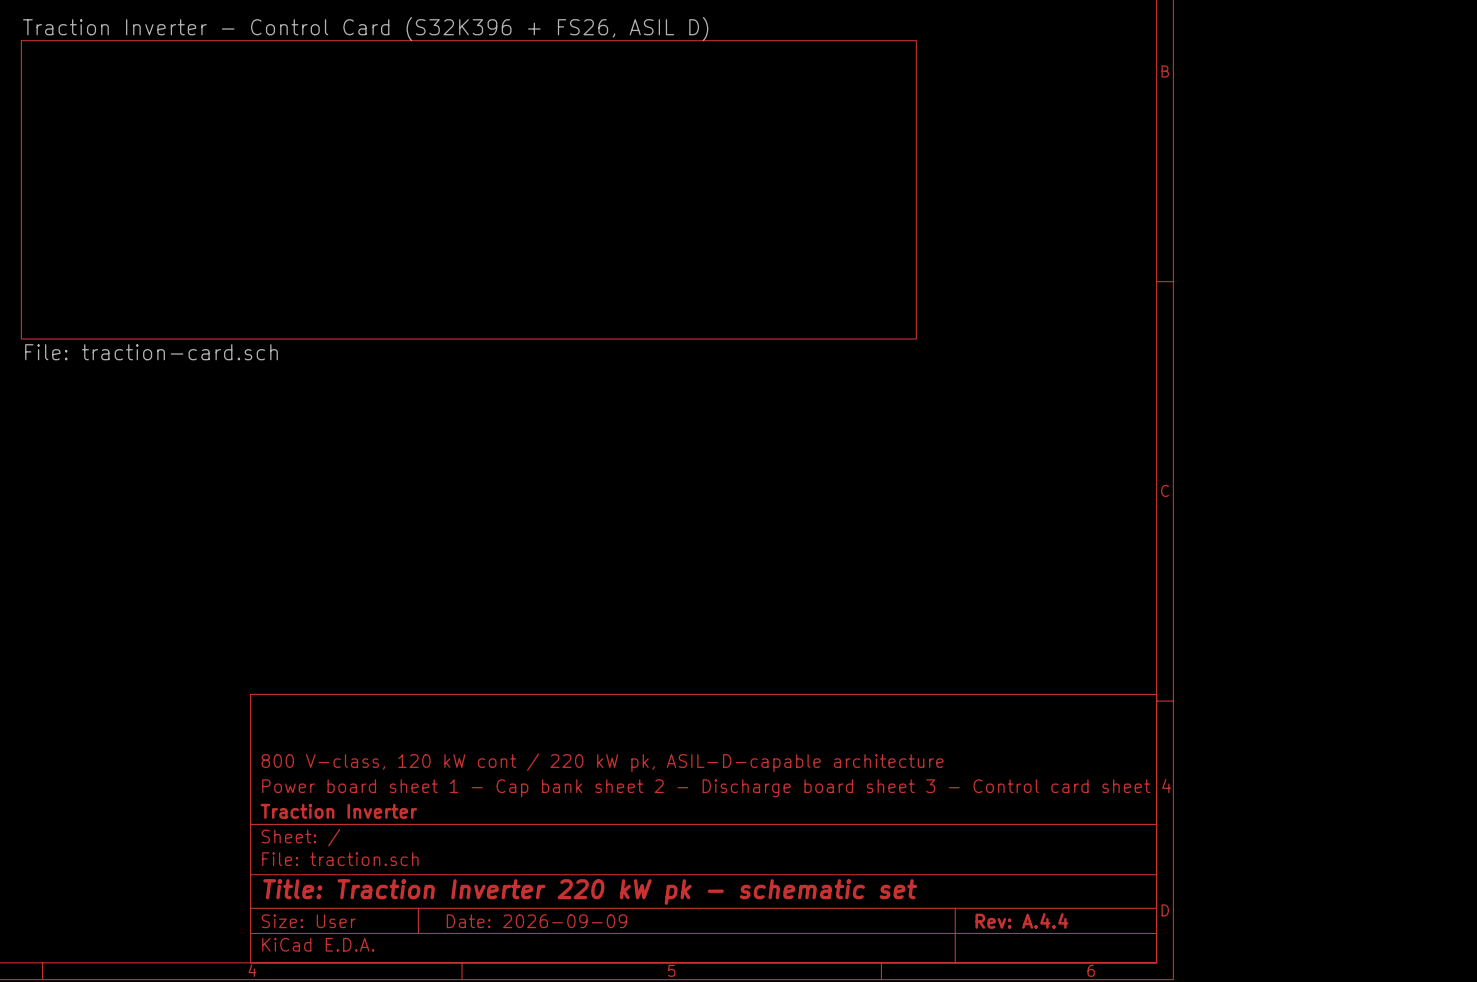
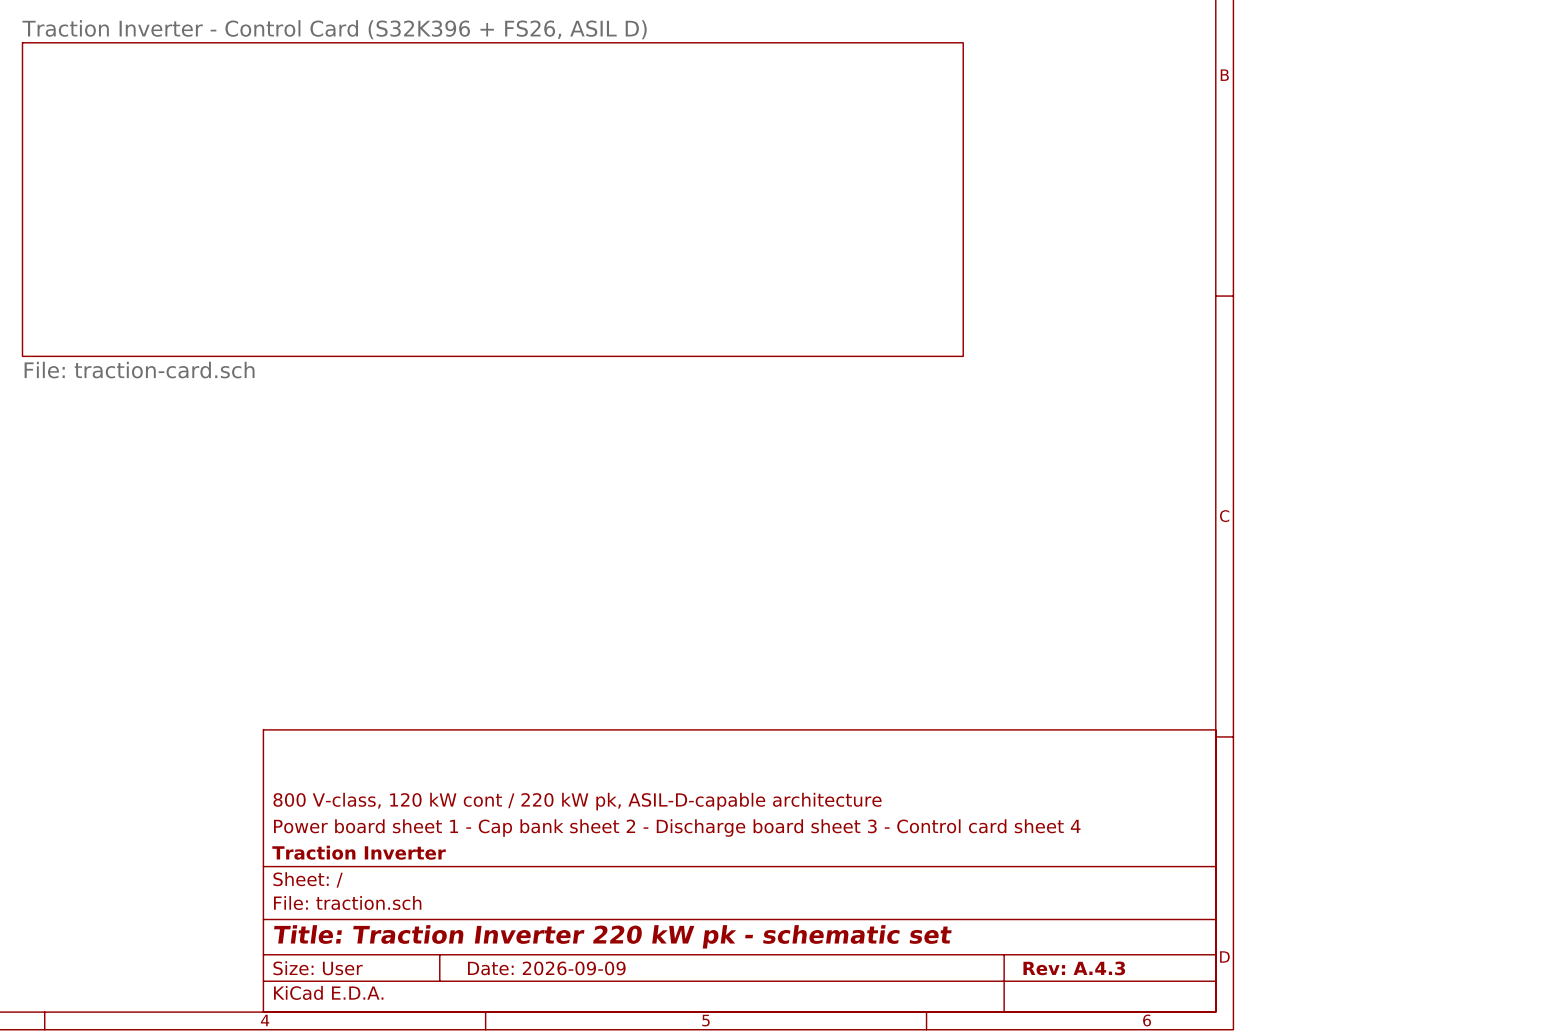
title block: Rev: A.4.4 (1021, 920) -> Rev: A.4.3 (1074, 968)

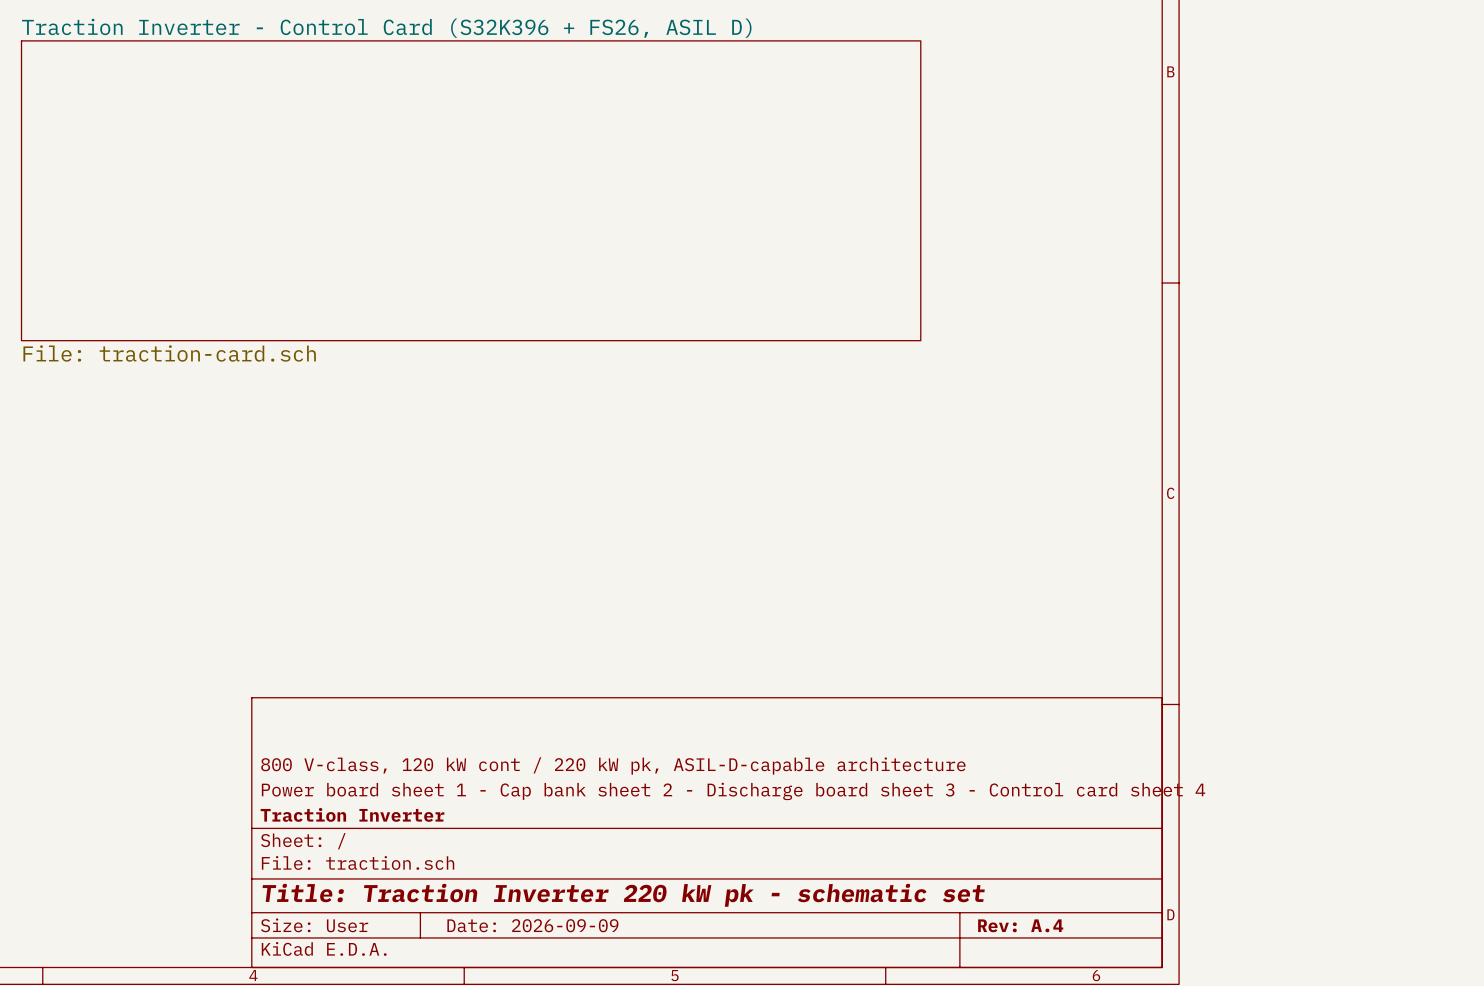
title block: Rev: A.4.3 (1074, 968) -> Rev: A.4 (1020, 925)

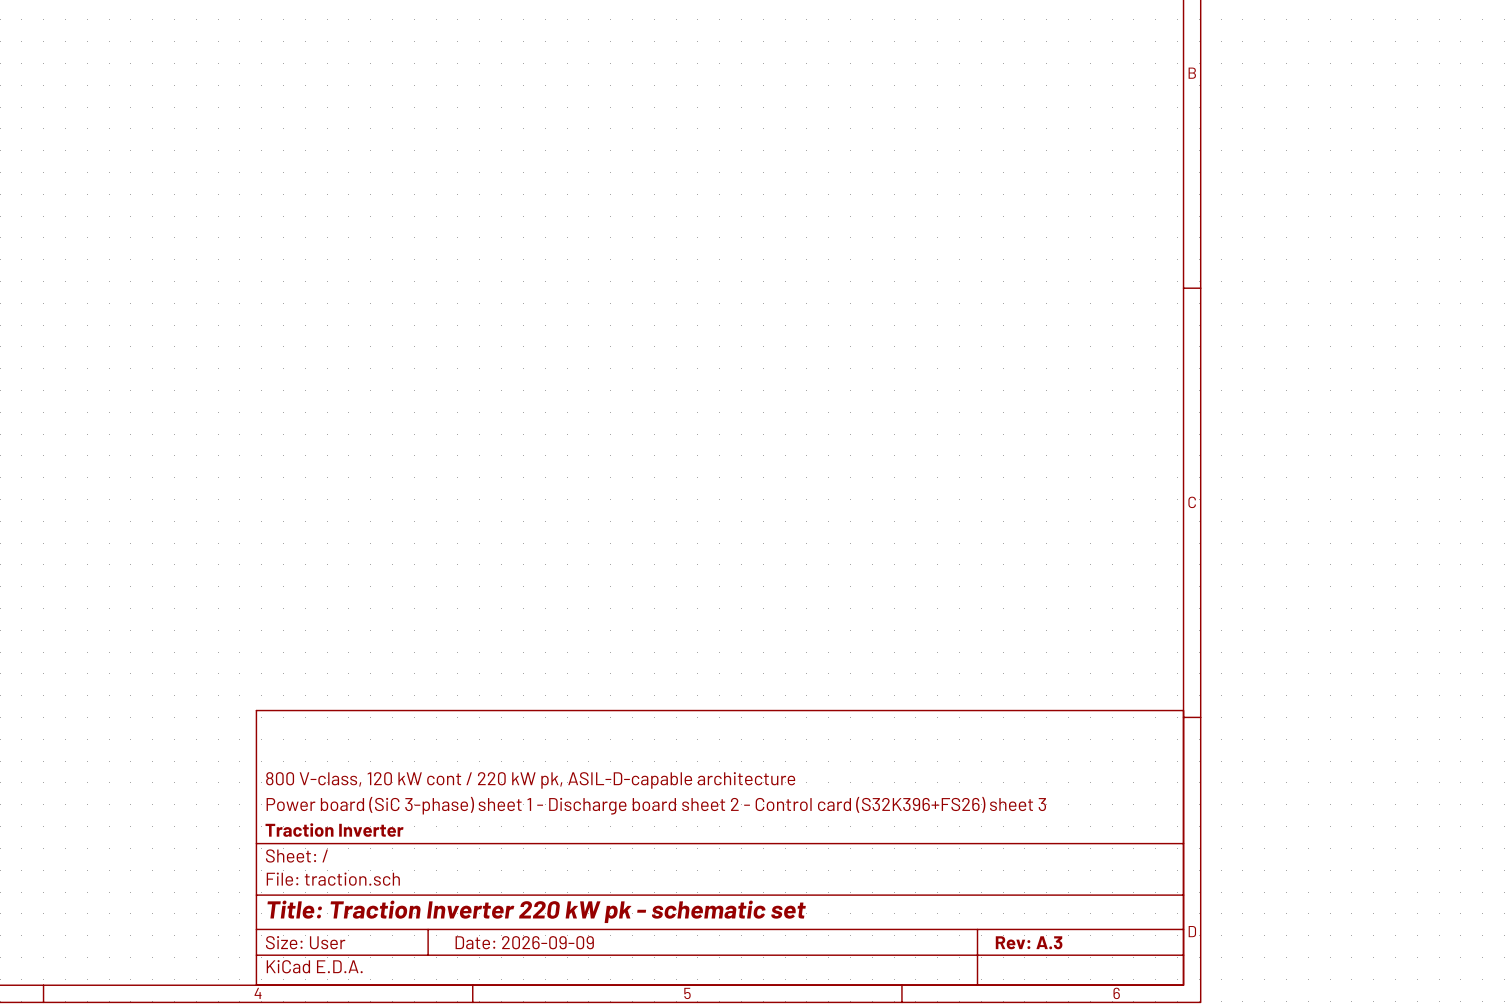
sheet Traction Inverter - Control Card (S32K396 + FS26, ASIL D): File: traction-card.sch (471, 190) -> none
title block: Power board sheet 1 - Cap bank sheet 2 - Discharge board sheet 3 - Control card sheet 4 (733, 791) -> Power board (SiC 3-phase) sheet 1 - Discharge board sheet 2 - Control card (S32K396+FS26) sheet 3 (656, 805)
title block: Rev: A.4 (1020, 925) -> Rev: A.3 (1029, 942)

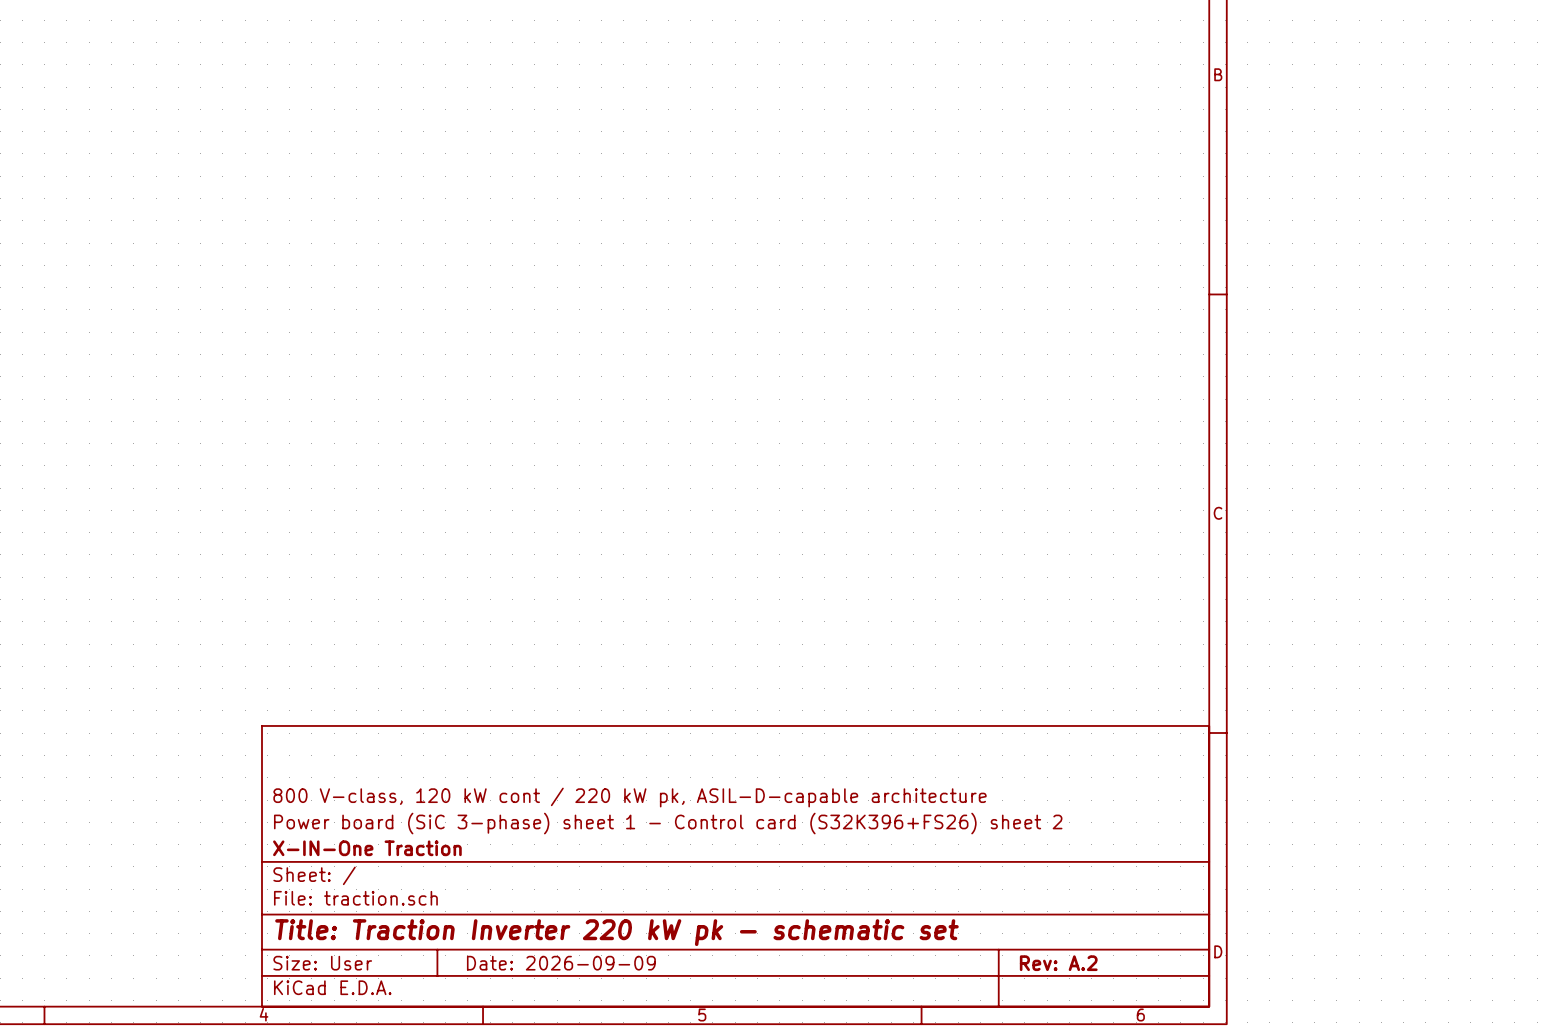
title block: Power board (SiC 3-phase) sheet 1 - Discharge board sheet 2 - Control card (S32K396+FS26) sheet 3 (656, 805) -> Power board (SiC 3-phase) sheet 1 - Control card (S32K396+FS26) sheet 2 (668, 823)
title block: Traction Inverter (334, 830) -> X-IN-One Traction (367, 848)
title block: Rev: A.3 (1029, 942) -> Rev: A.2 (1058, 963)

